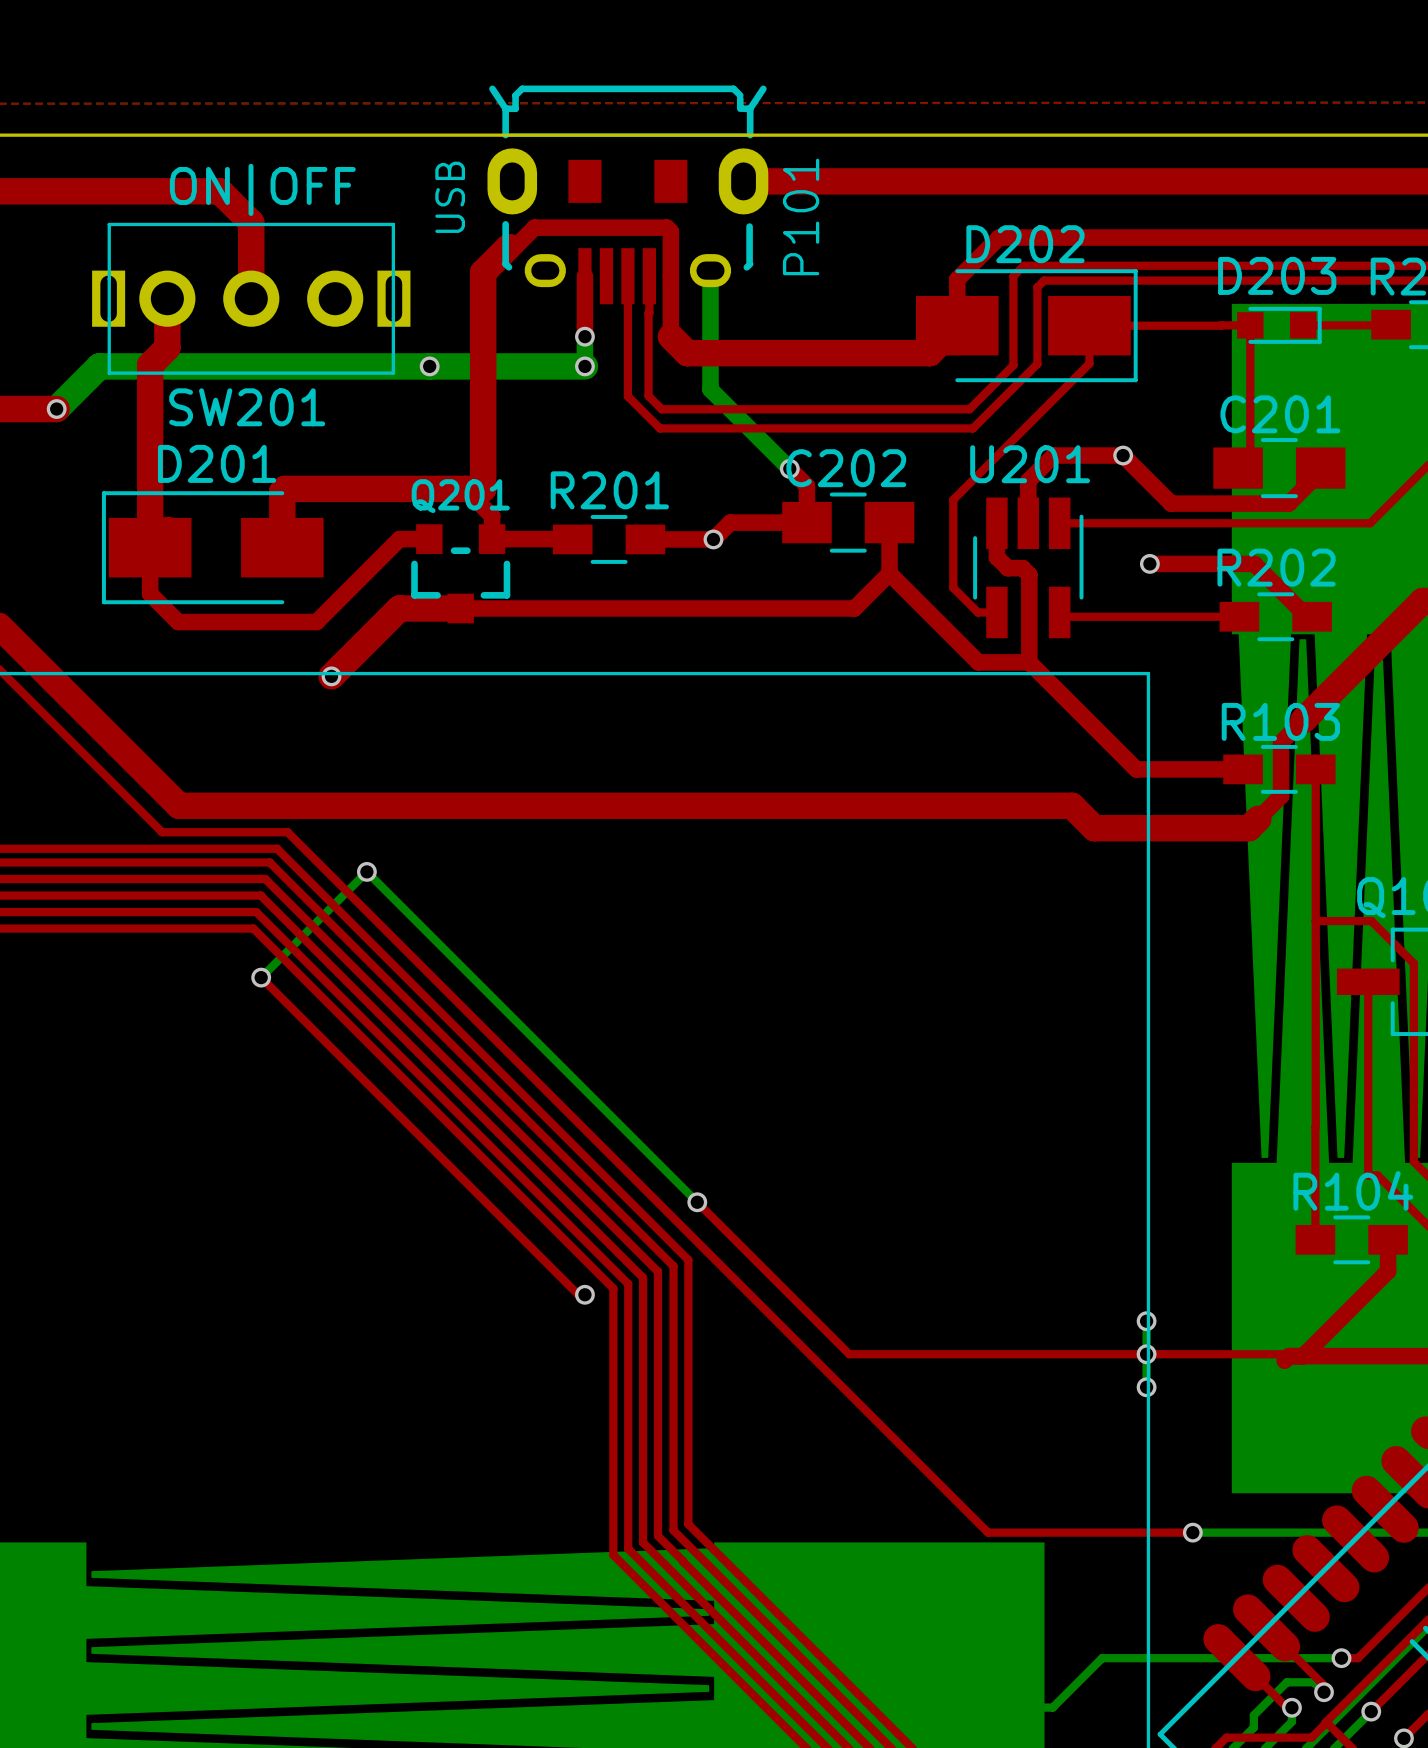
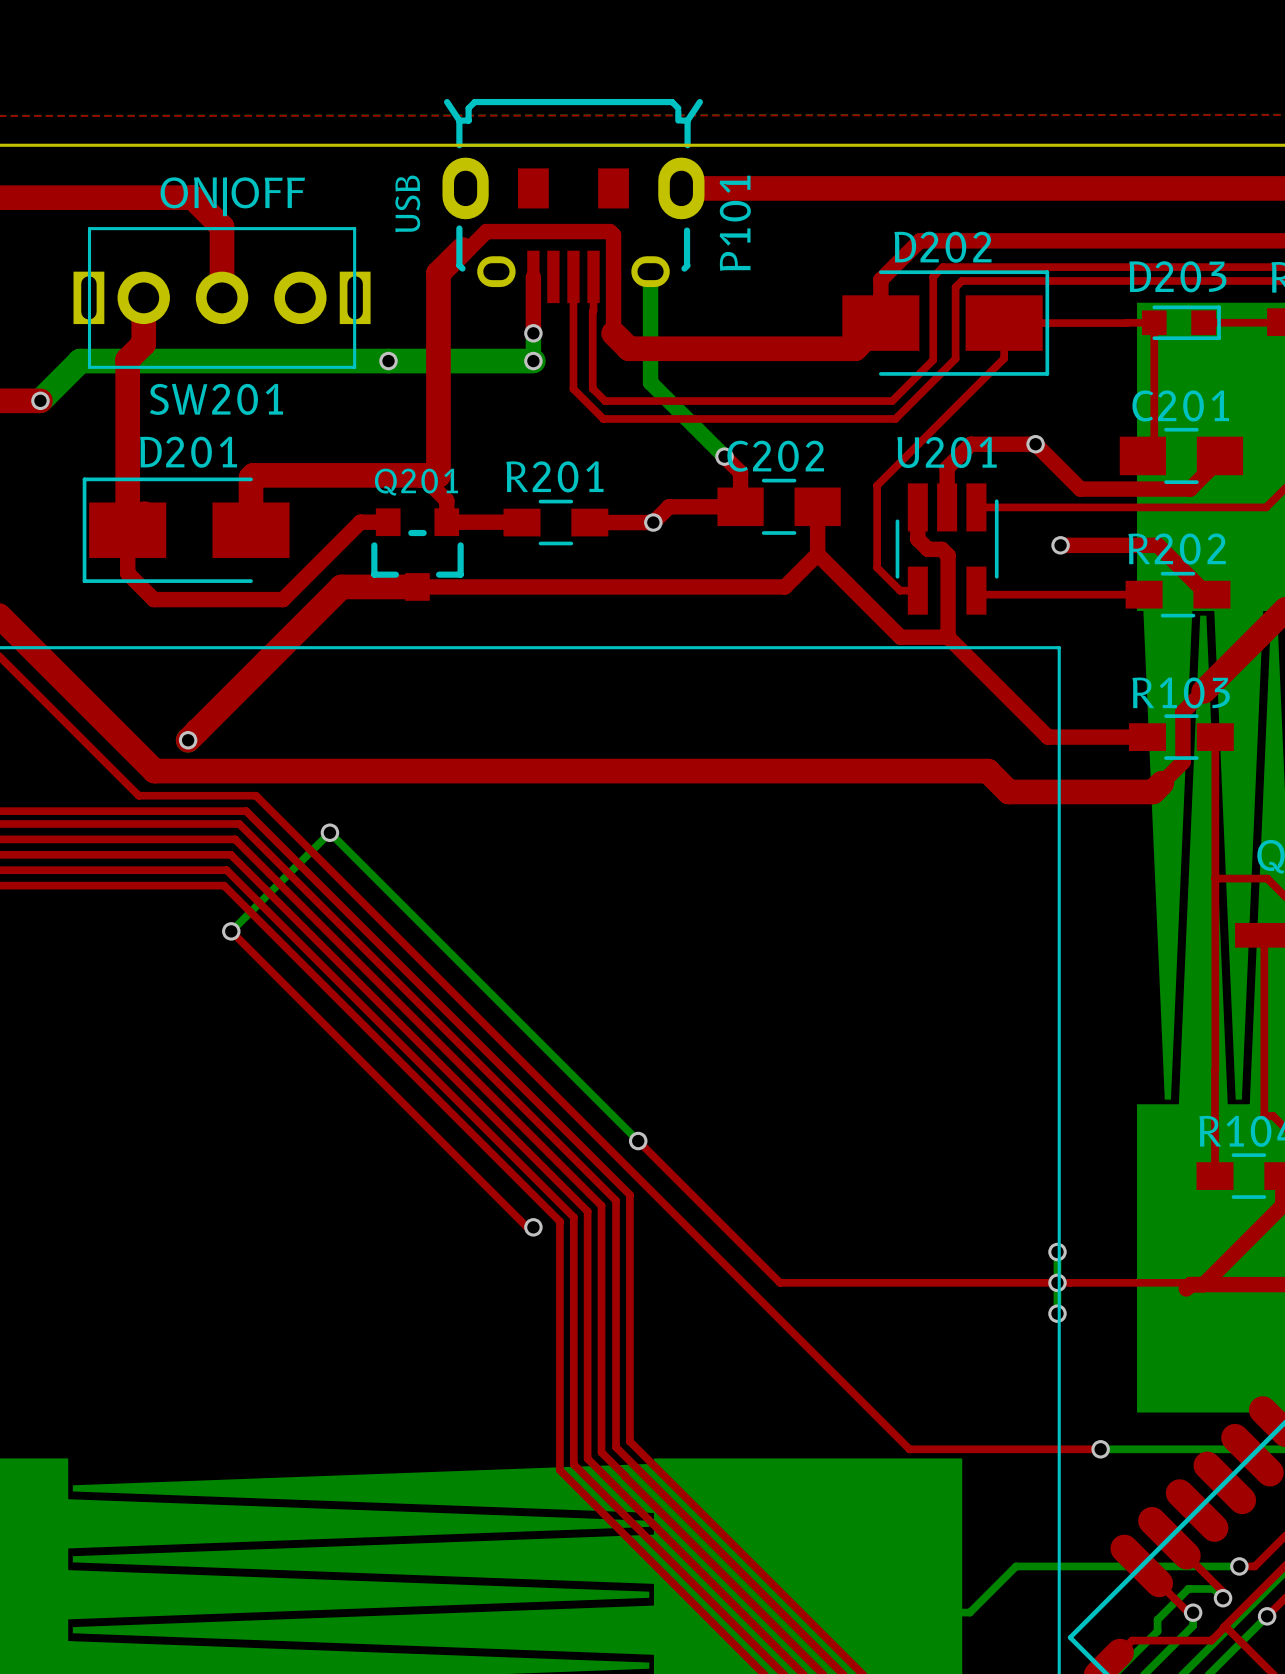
top track: (399, 608) (331, 676) -> (360, 586) (341, 586) (188, 740)
via position: (331, 676) -> (188, 740)

